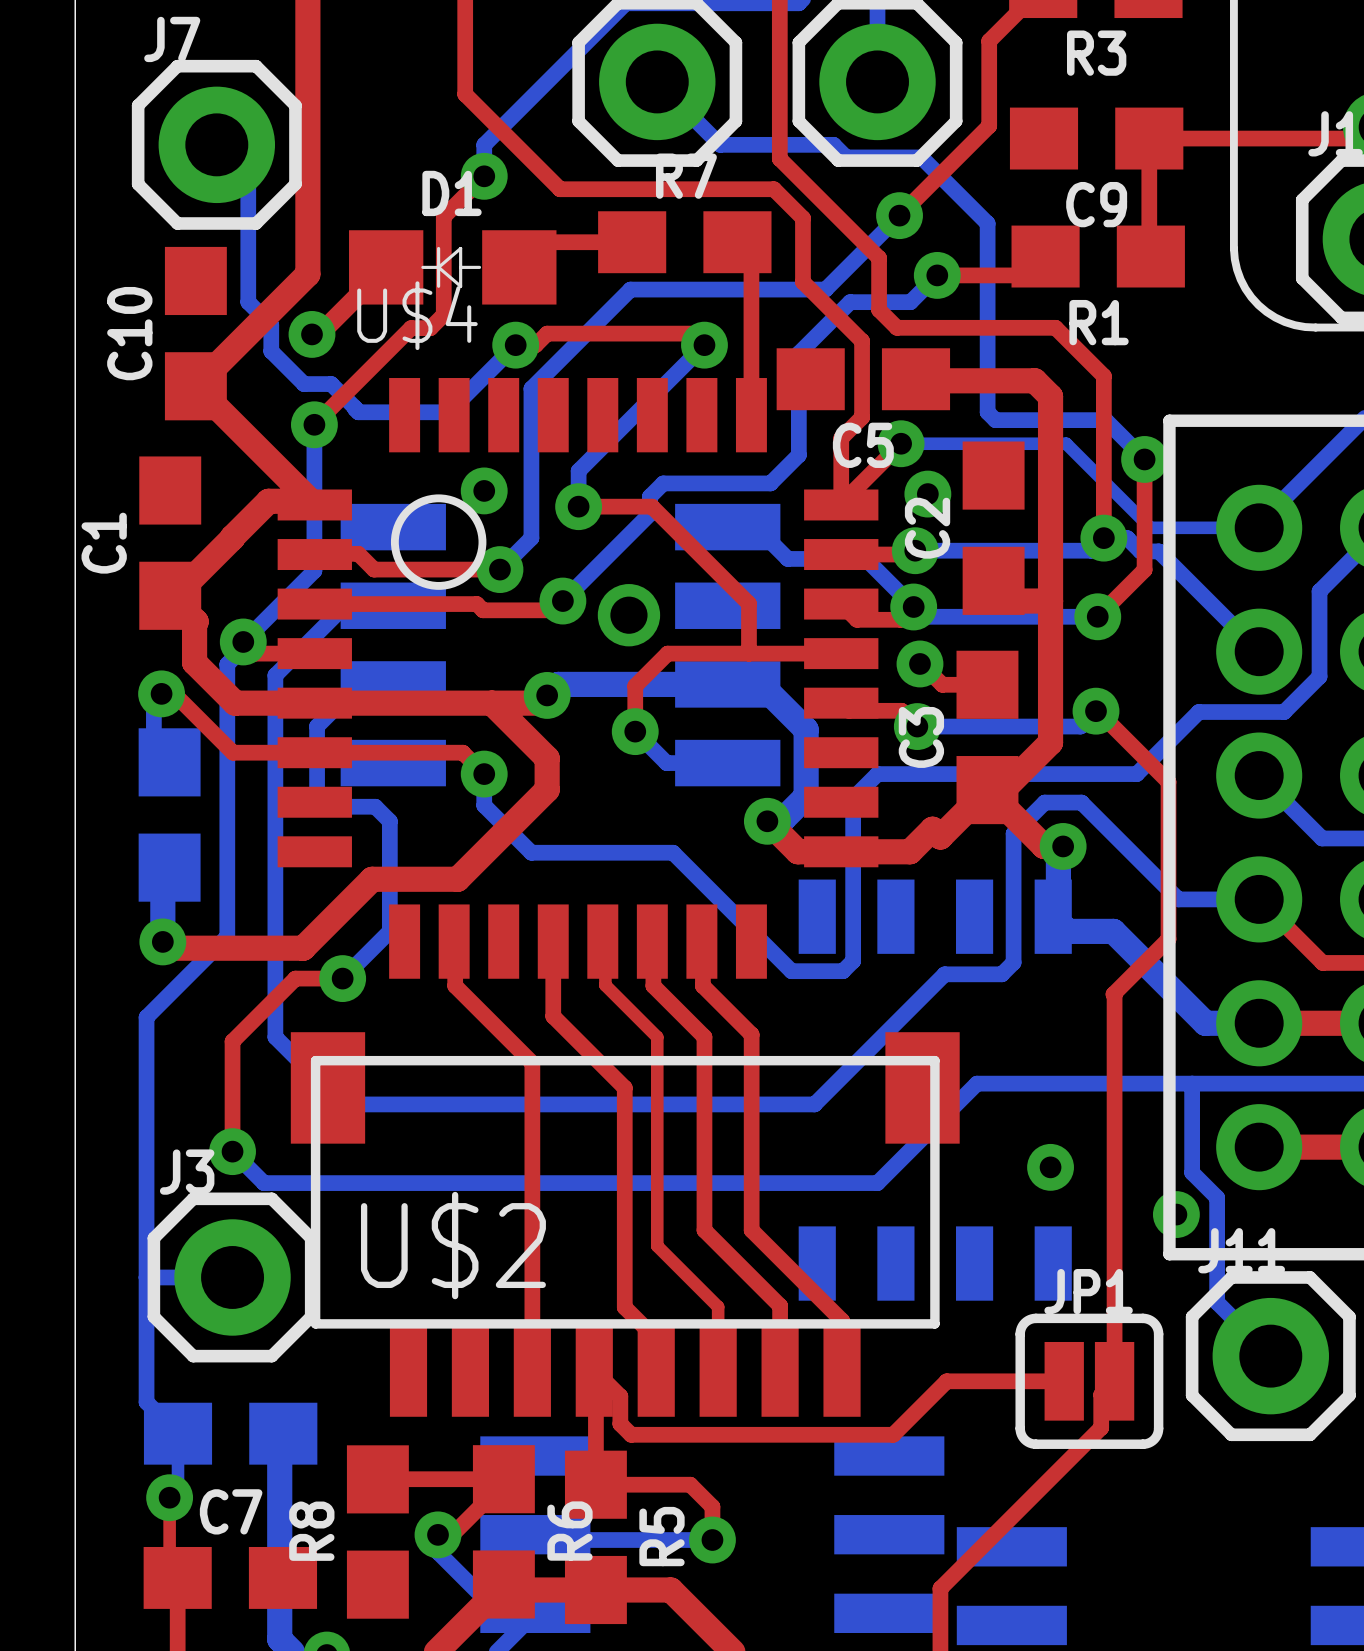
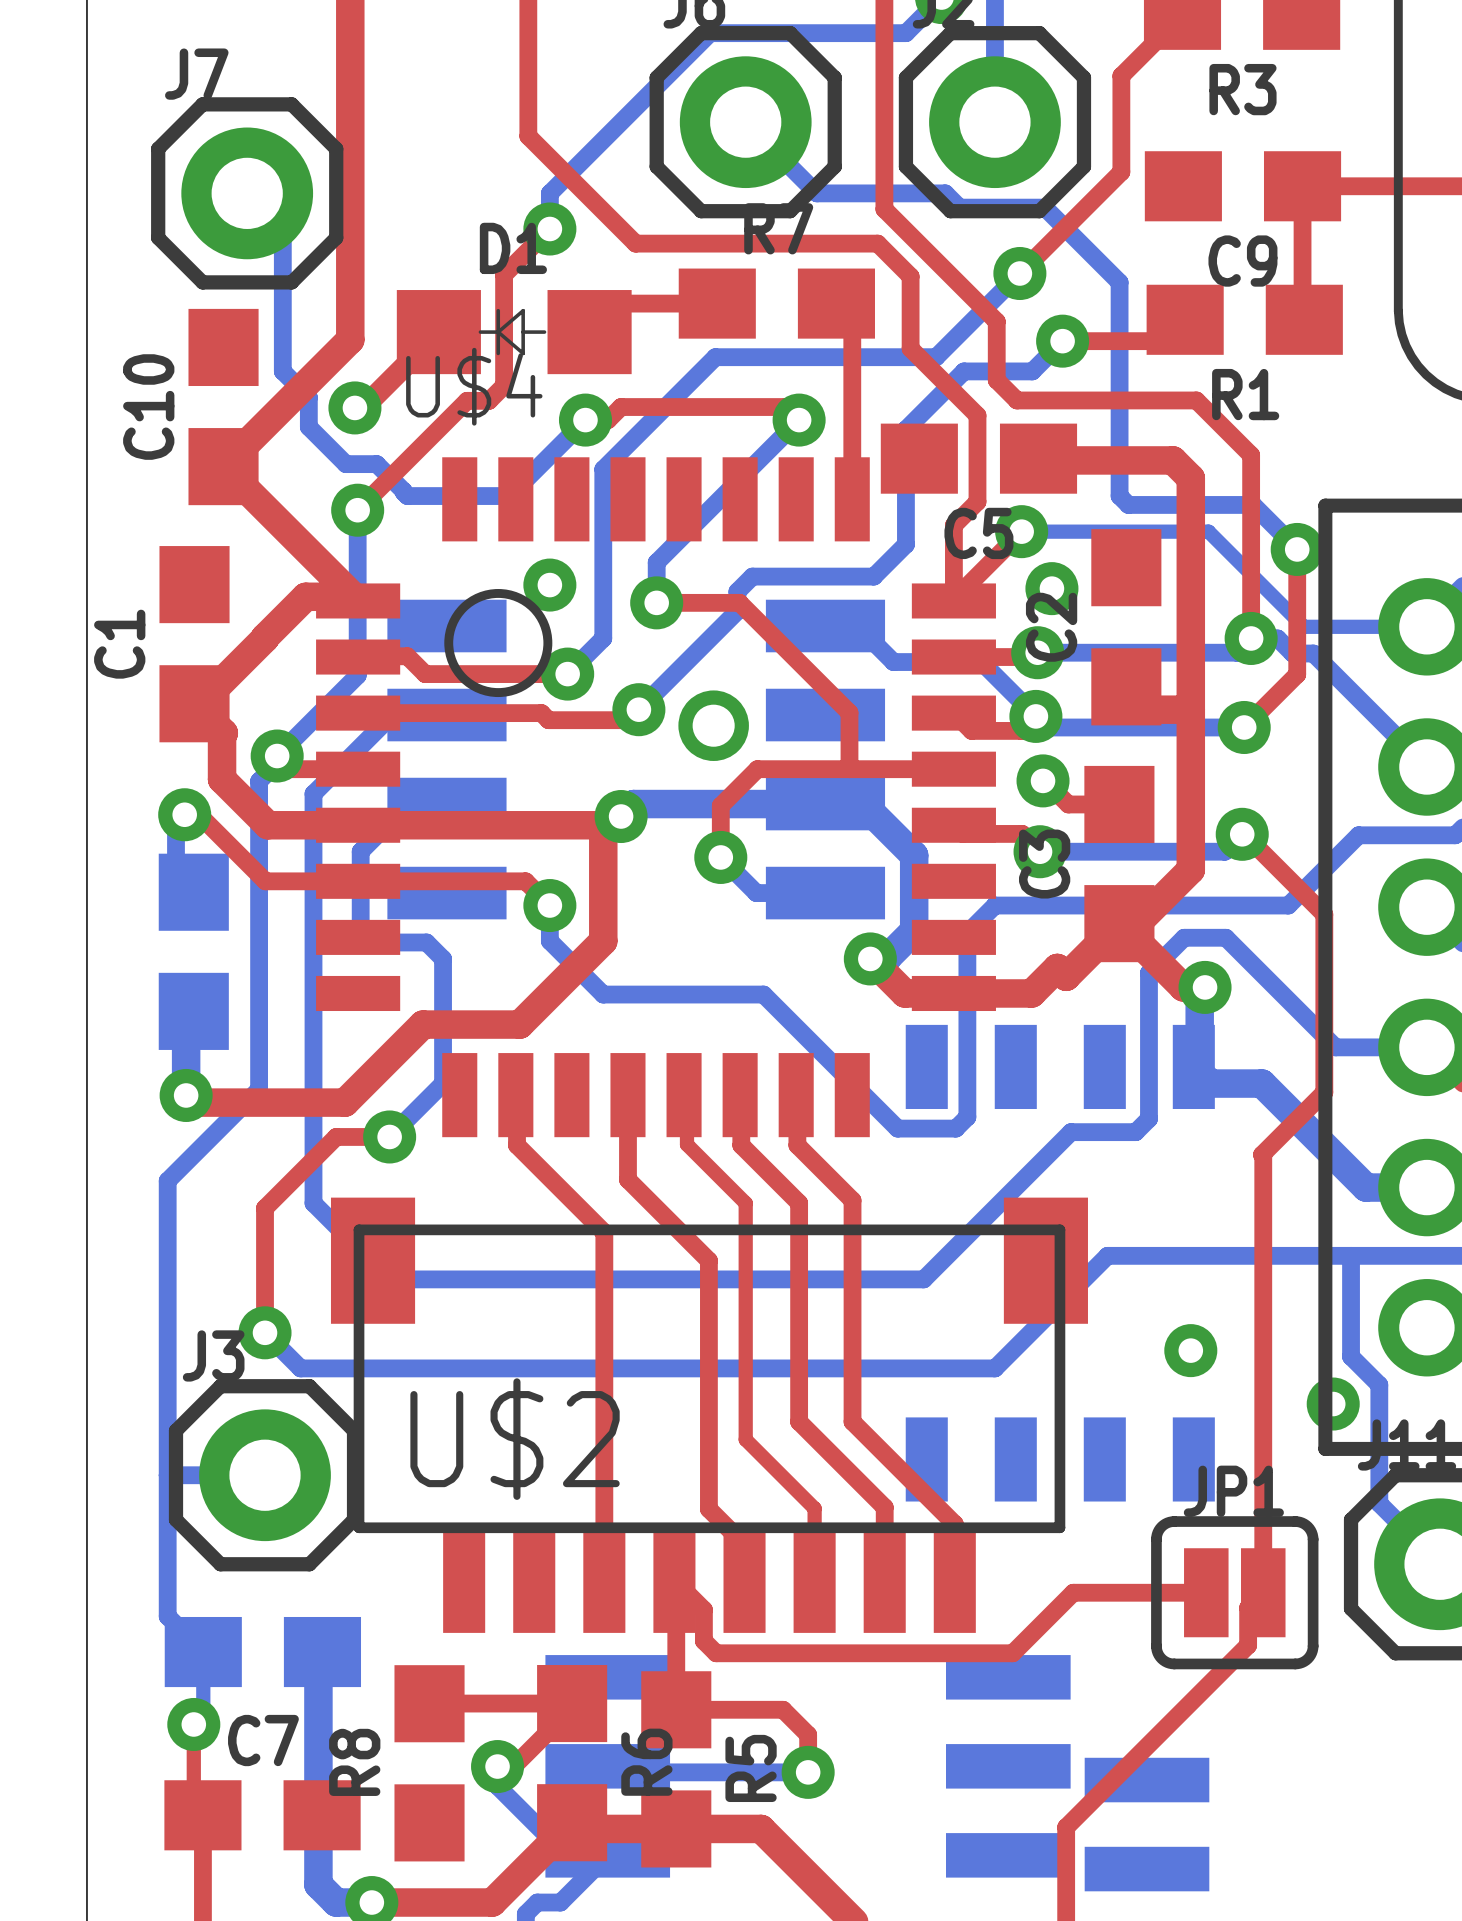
top track: (491, 703) (547, 758) (547, 789) (531, 805) -> (603, 825) (603, 941)

